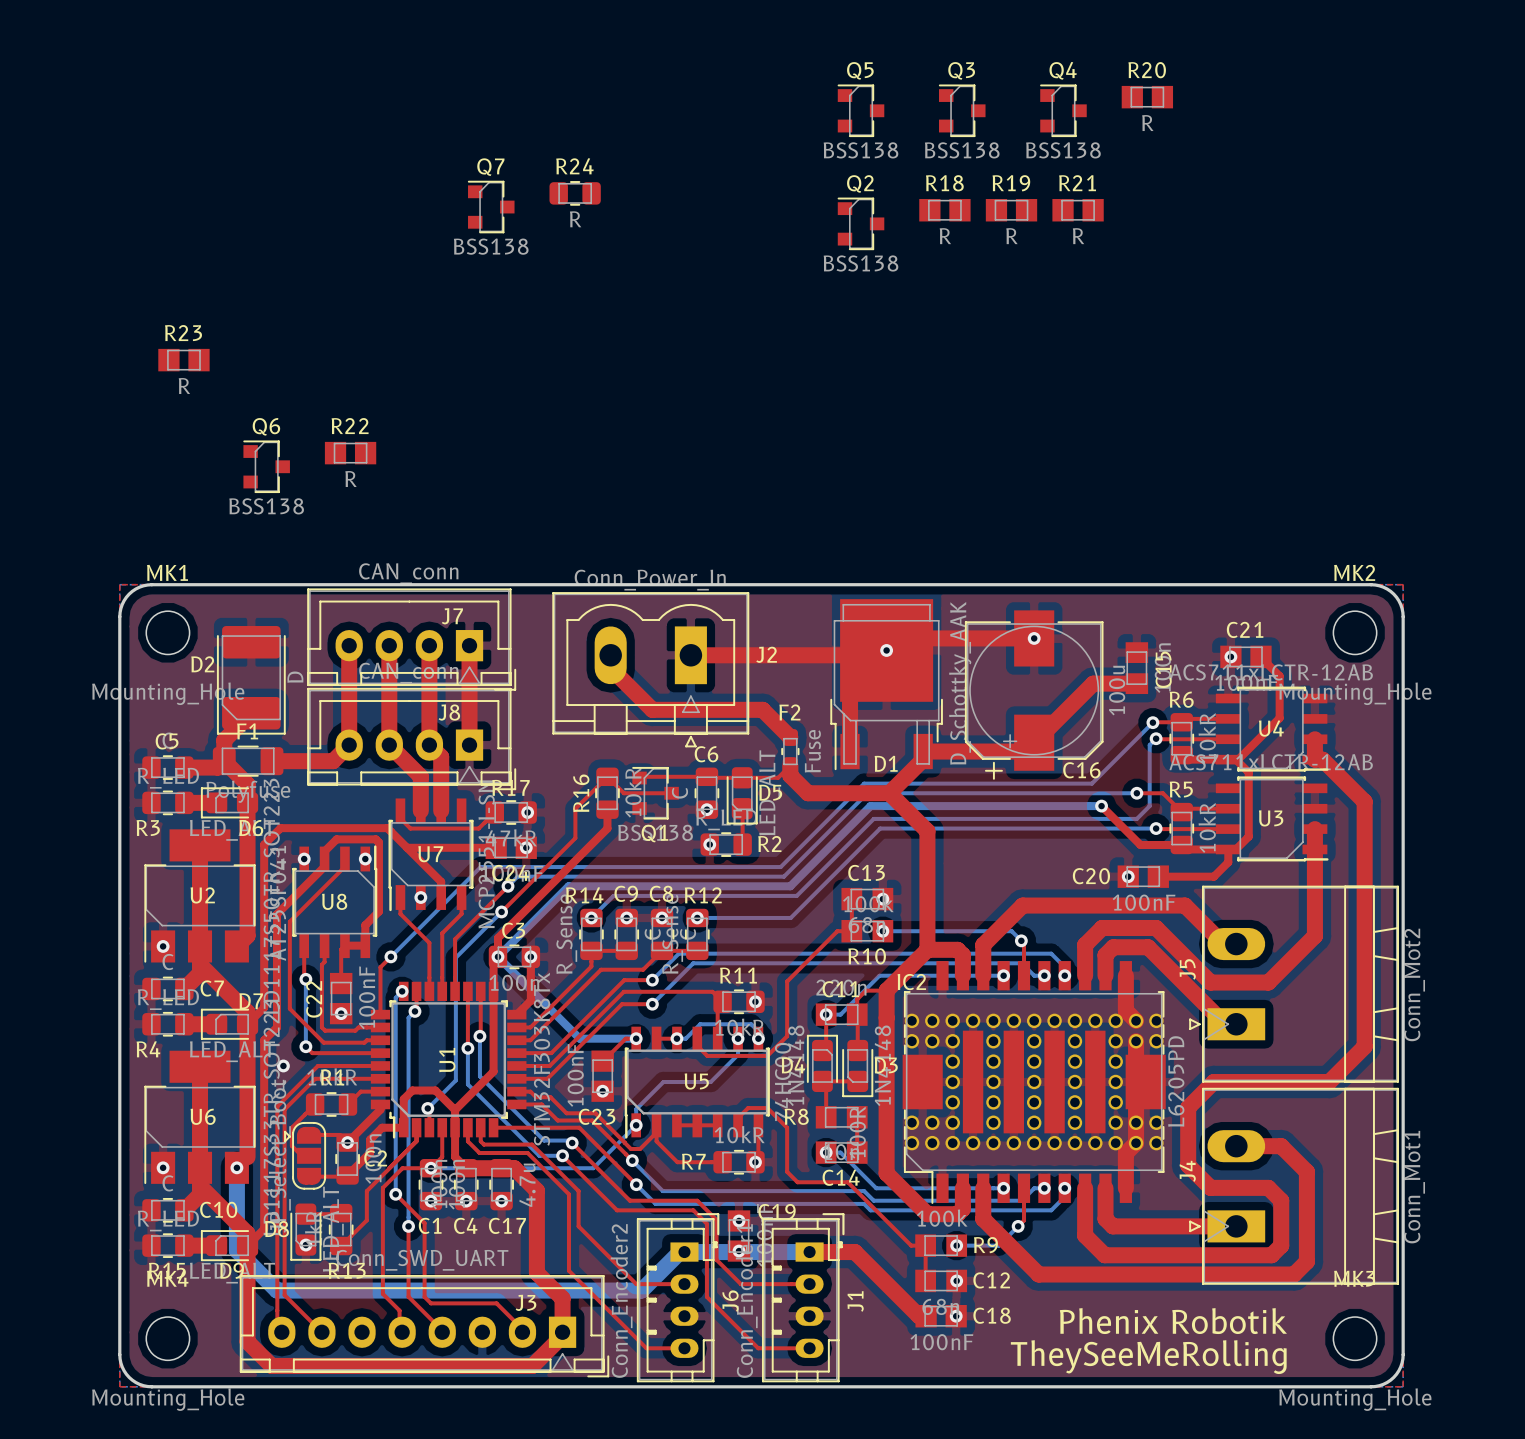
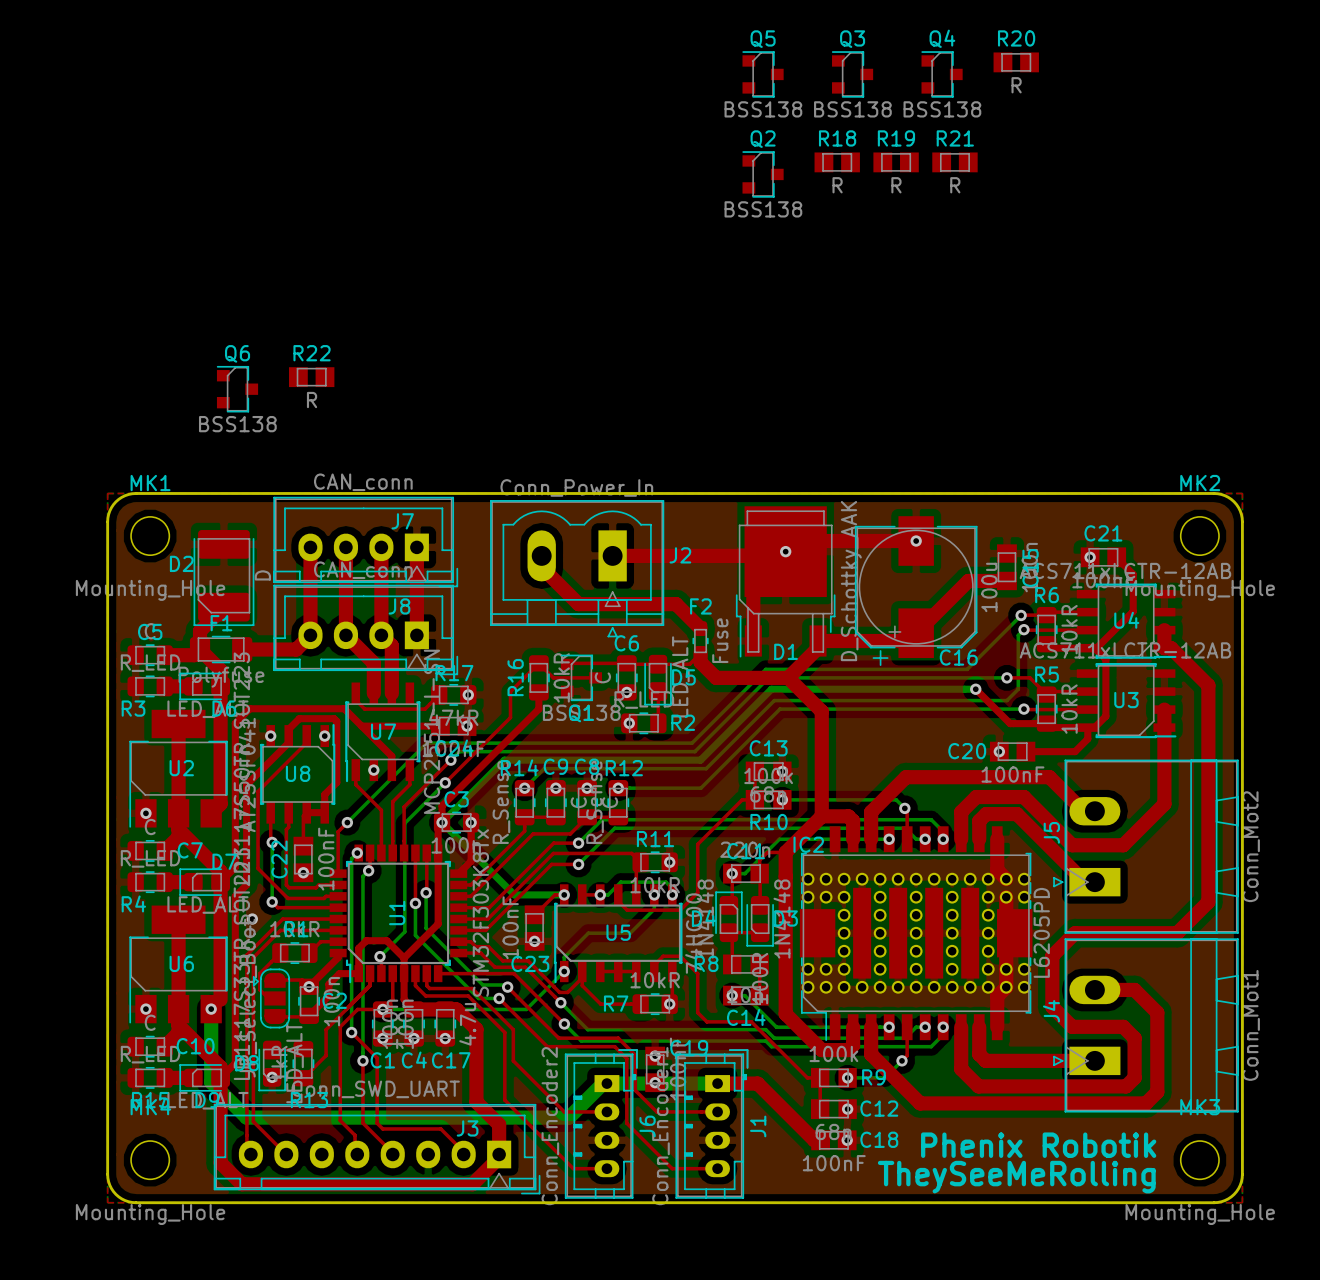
R24: R (575, 193) -> none
Q7: BSS138 (491, 207) -> none
R23: R (183, 360) -> none

